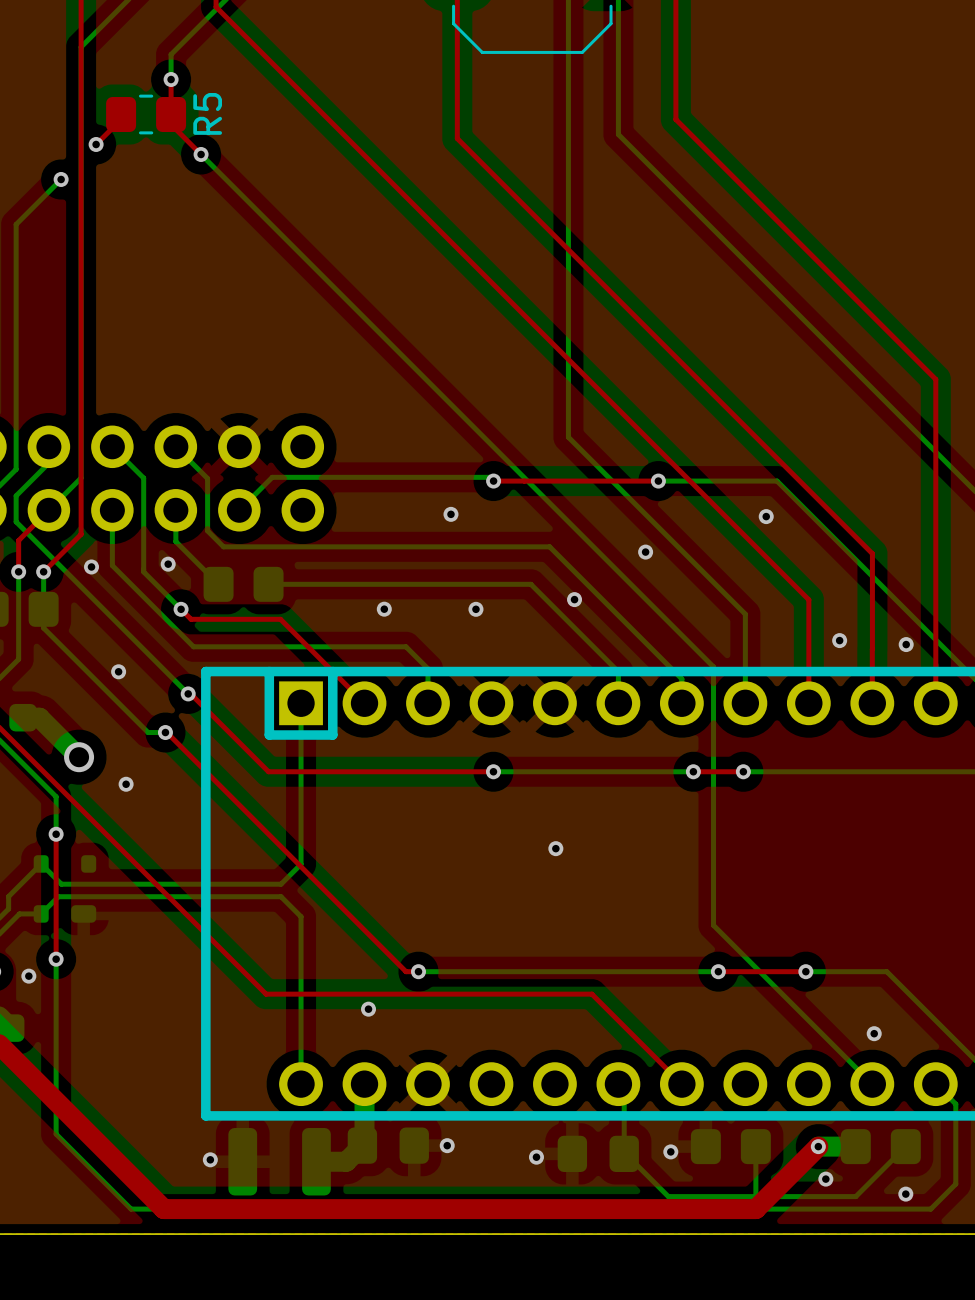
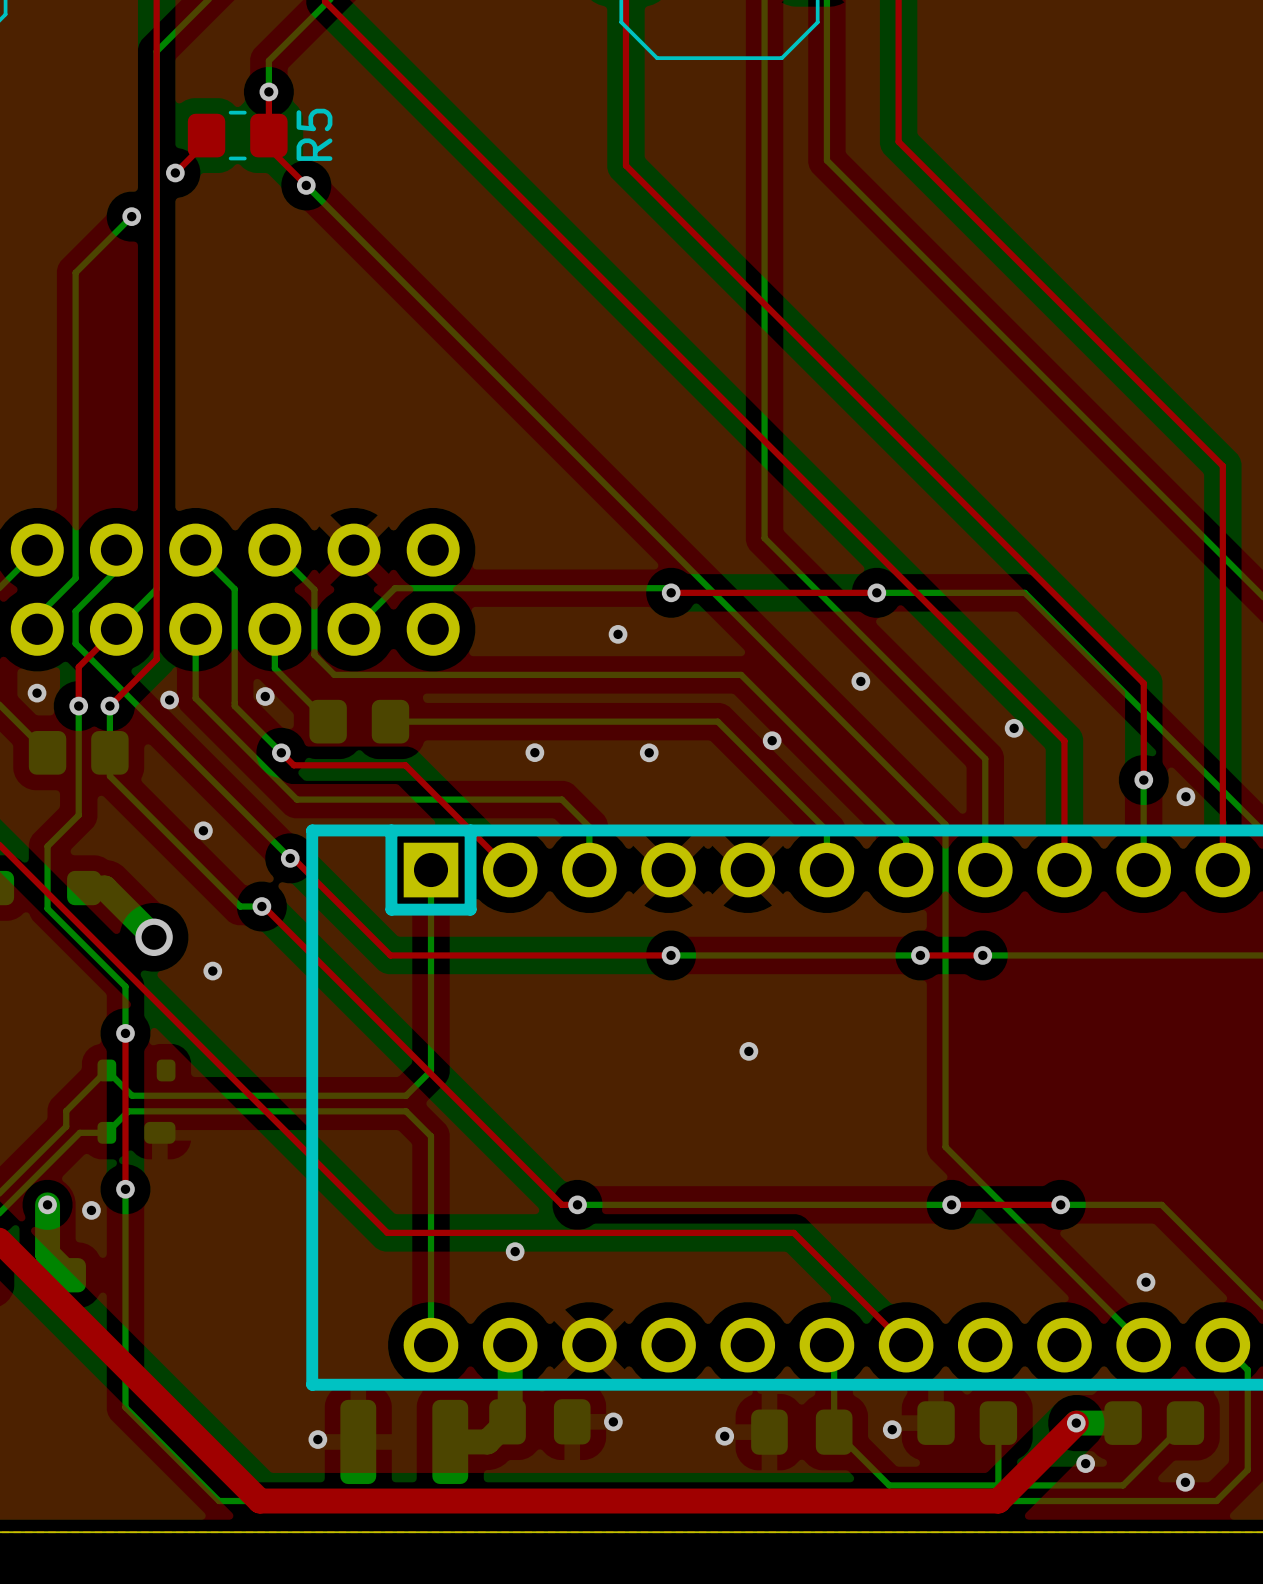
via: (766, 516) -> none
via: none -> (1014, 728)
bottom track: none -> (1143, 780) (1143, 870)
via position: (839, 640) -> (1143, 780)

